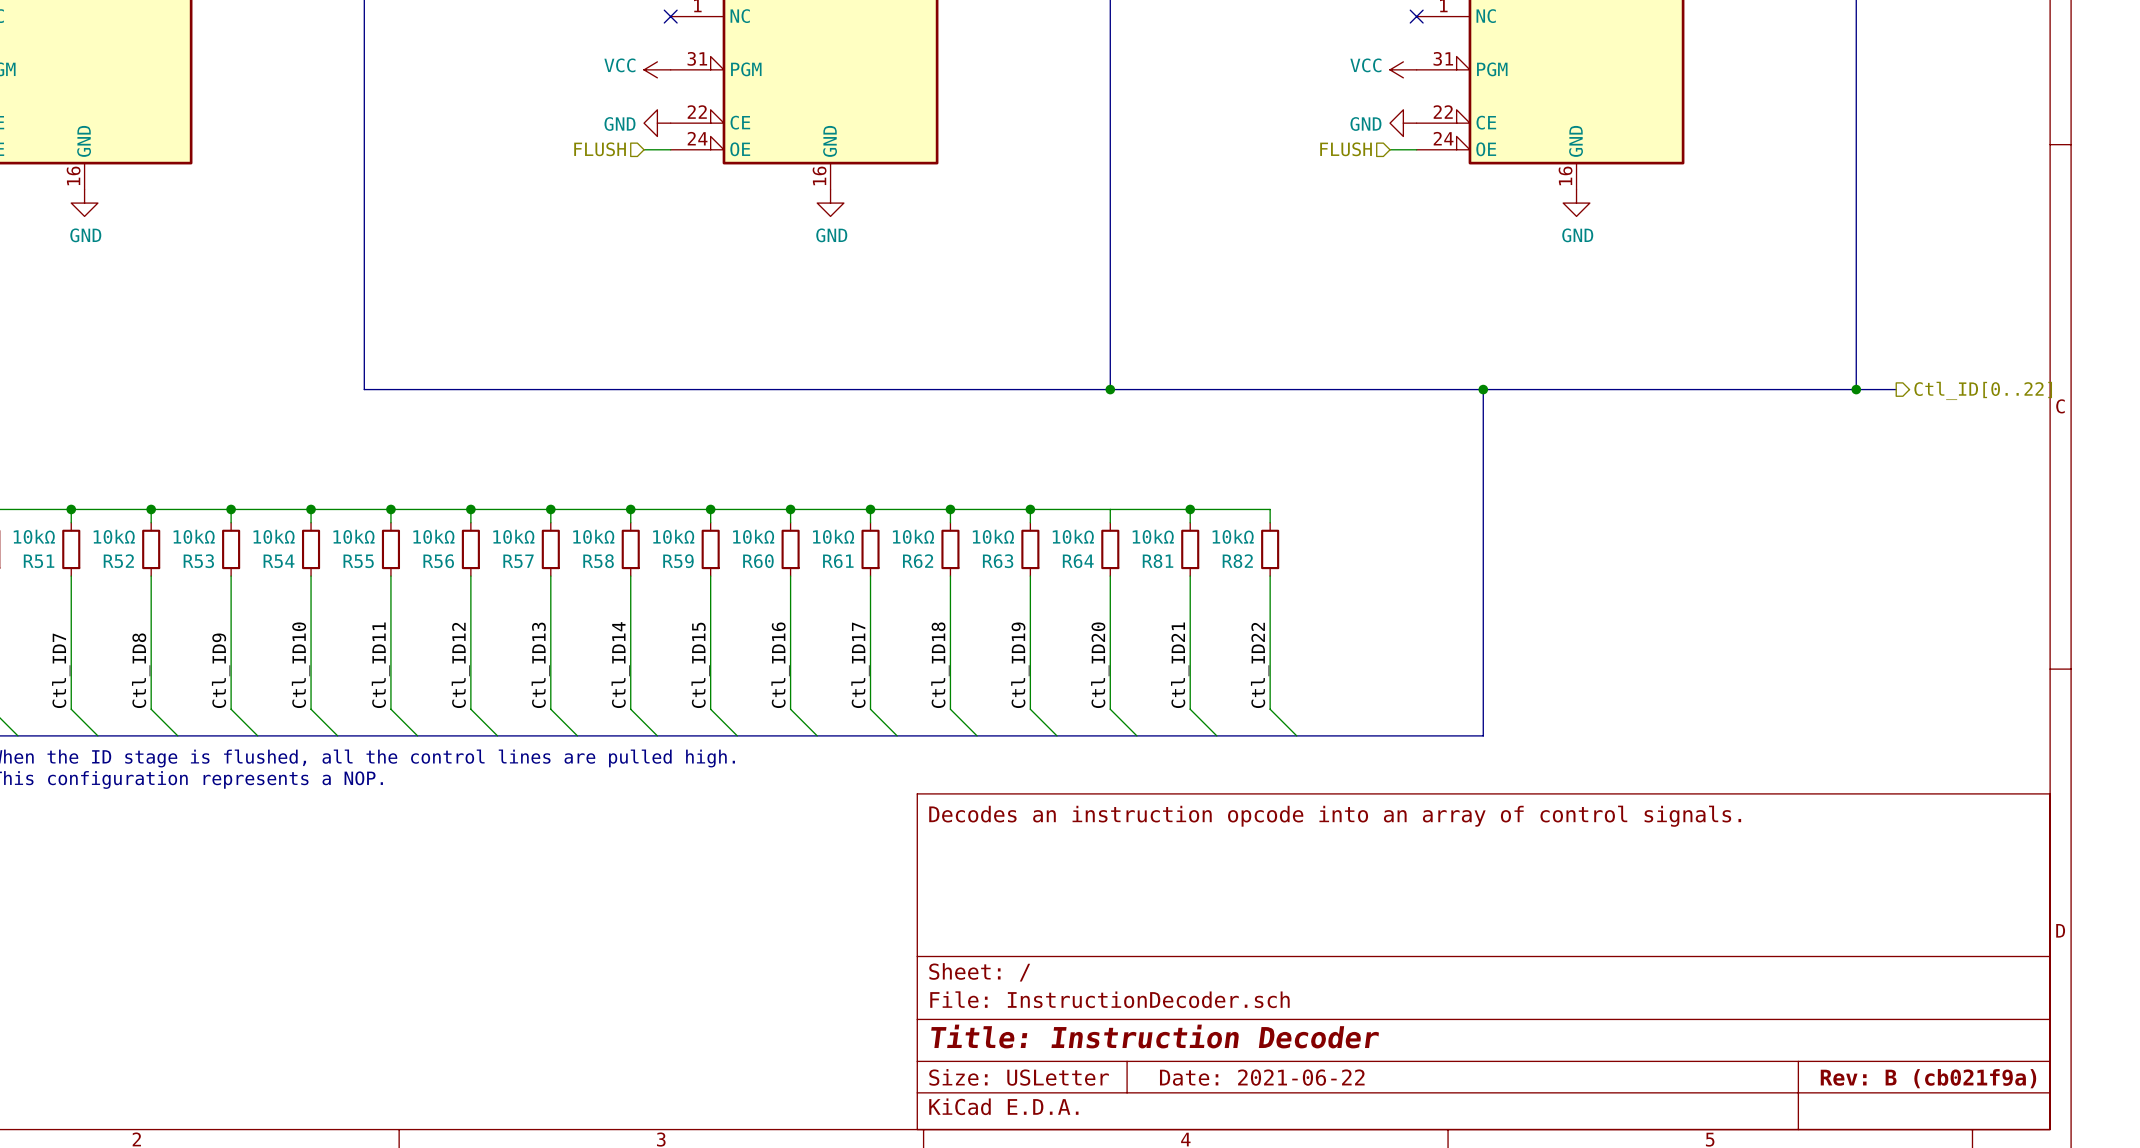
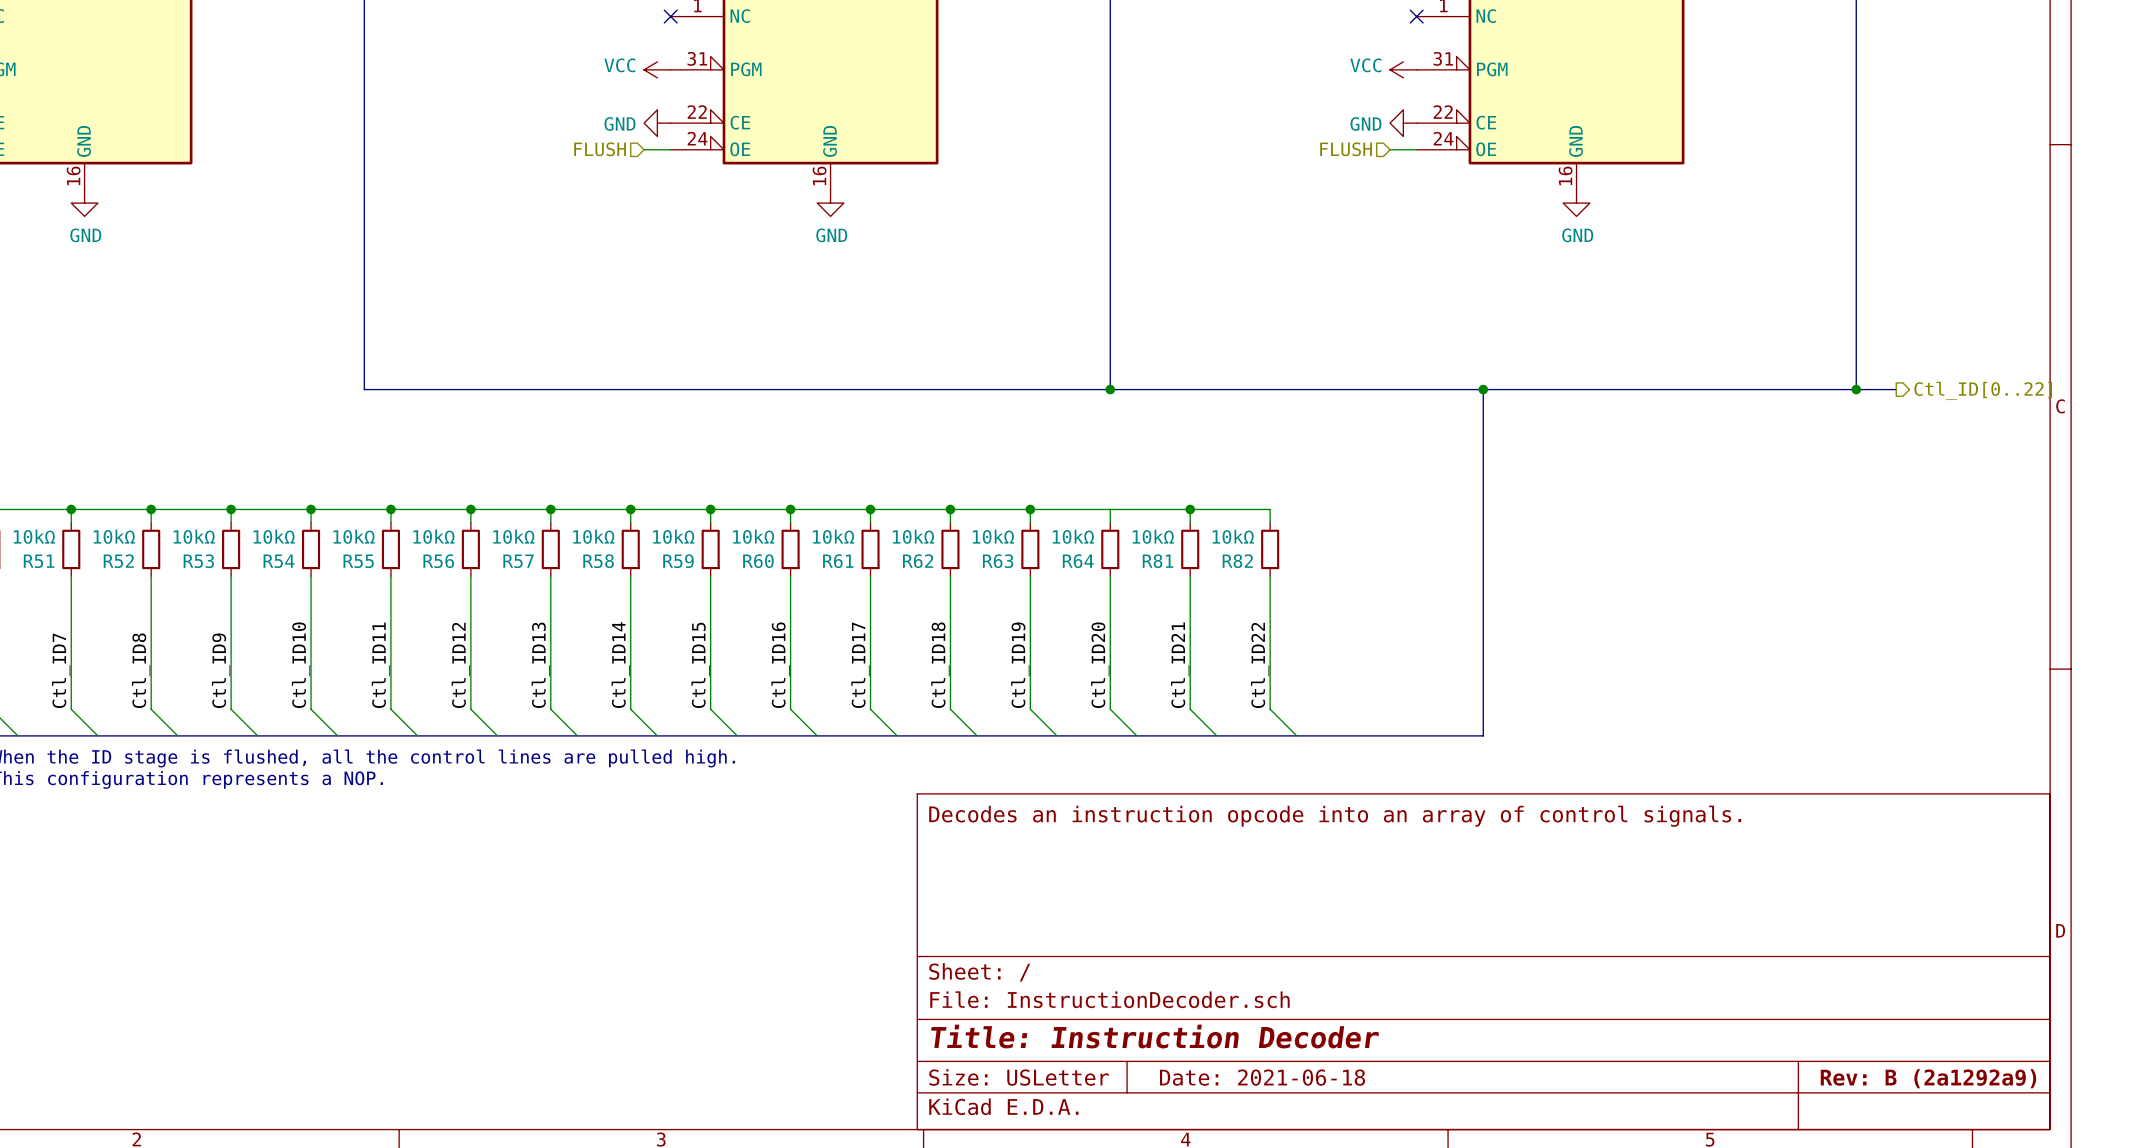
title block: Date: 2021-06-22 (1262, 1077) -> Date: 2021-06-18 (1262, 1077)
title block: Rev: B (cb021f9a) (1928, 1078) -> Rev: B (2a1292a9) (1928, 1078)

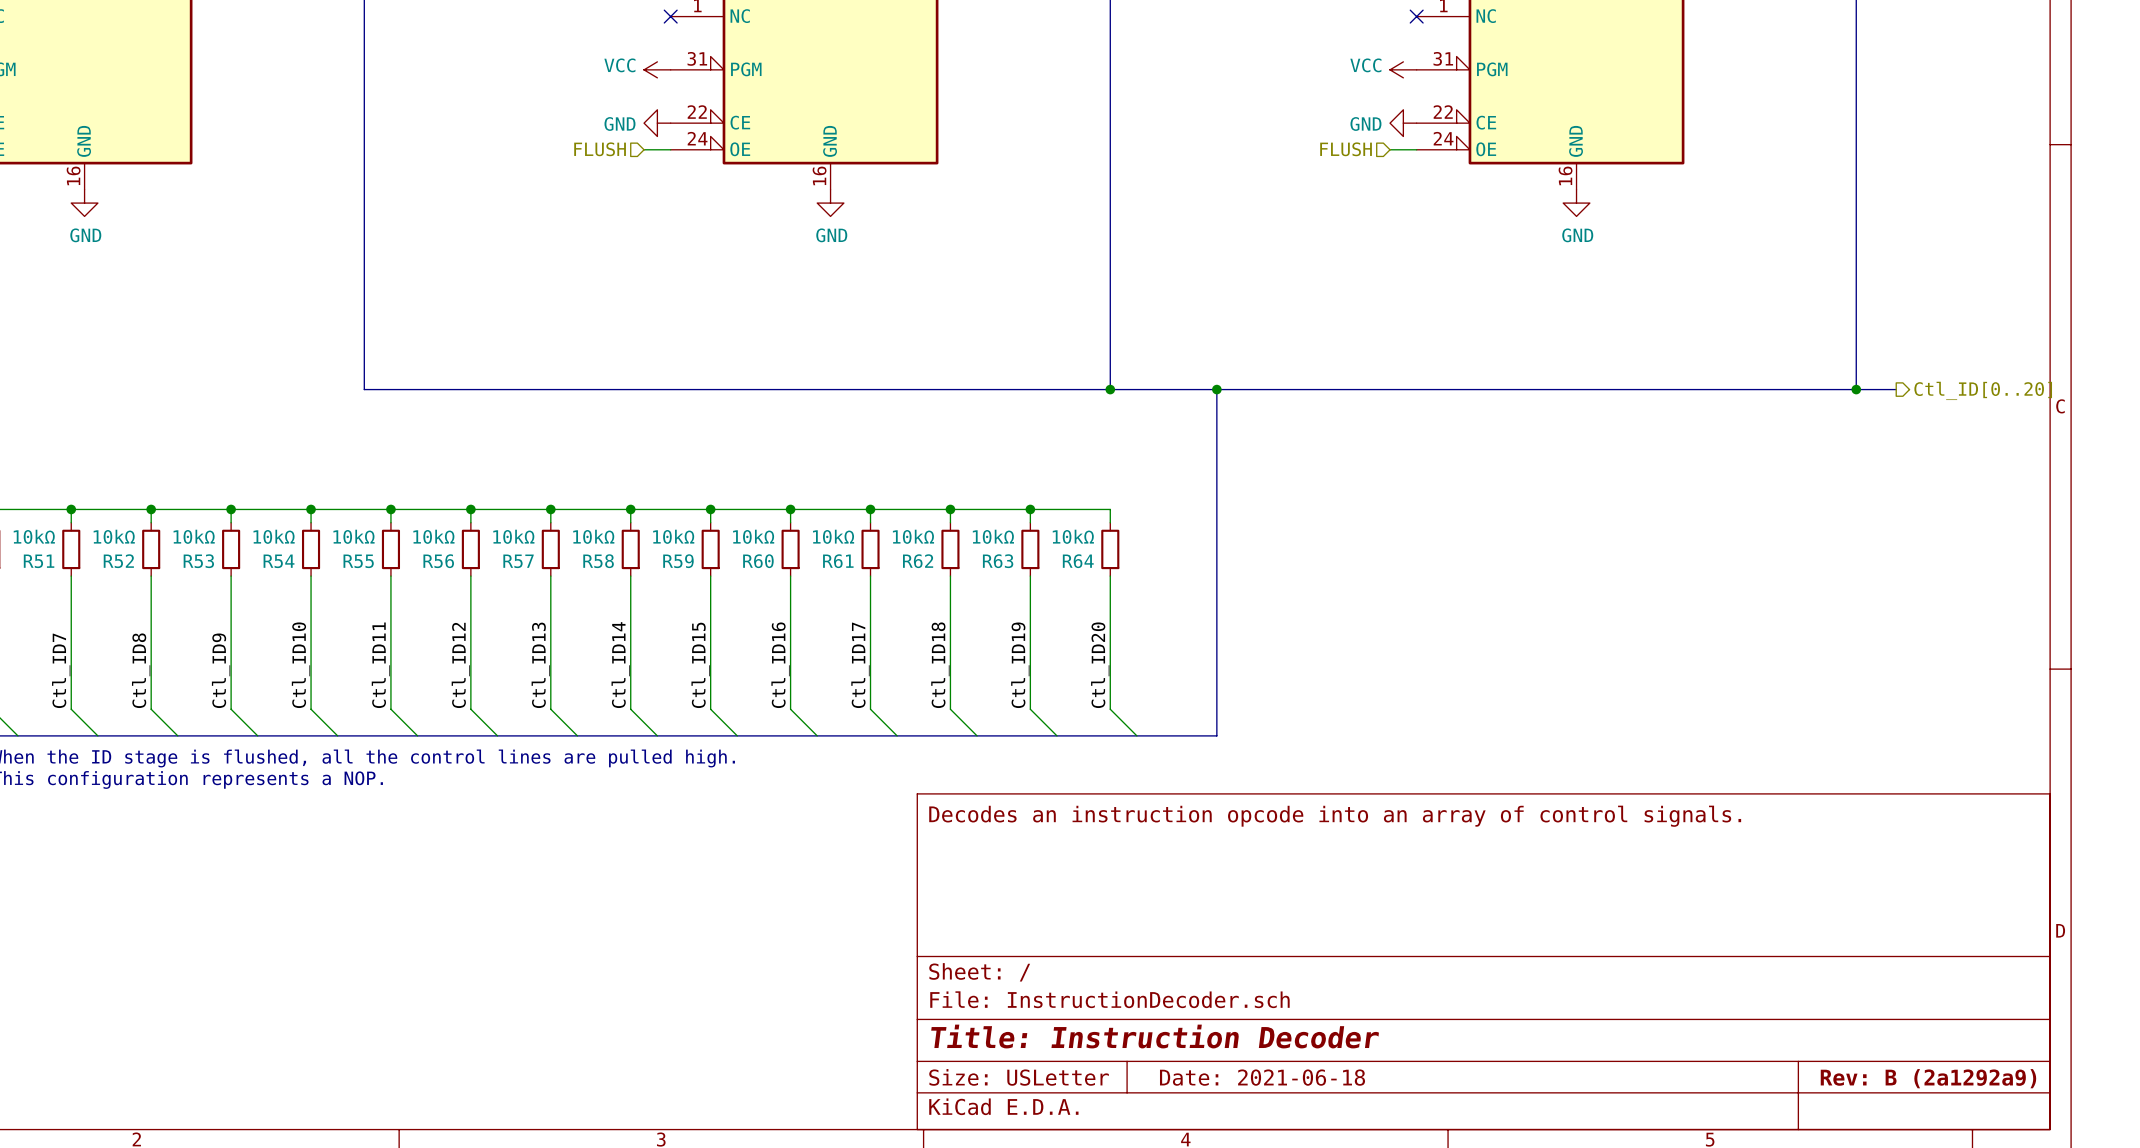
junction: none -> (1216, 389)
bus: (1483, 389) (1483, 735) (1216, 735) -> (1216, 389) (1216, 735)
junction: (1483, 389) -> none
hierarchical label: Ctl_ID[0..22] (1983, 390) -> Ctl_ID[0..20] (1983, 390)
wire: (1110, 509) (1270, 509) (1270, 522) -> none
wire: (1190, 509) (1190, 522) -> none
junction: (1190, 509) -> none
R81: 10kΩ (1190, 549) -> none
R82: 10kΩ (1270, 549) -> none
wire: (1190, 576) (1190, 709) (1216, 735) -> none
wire: (1270, 576) (1270, 709) (1296, 735) -> none
label: Ctl_ID21 (1180, 665) -> none
label: Ctl_ID22 (1260, 665) -> none

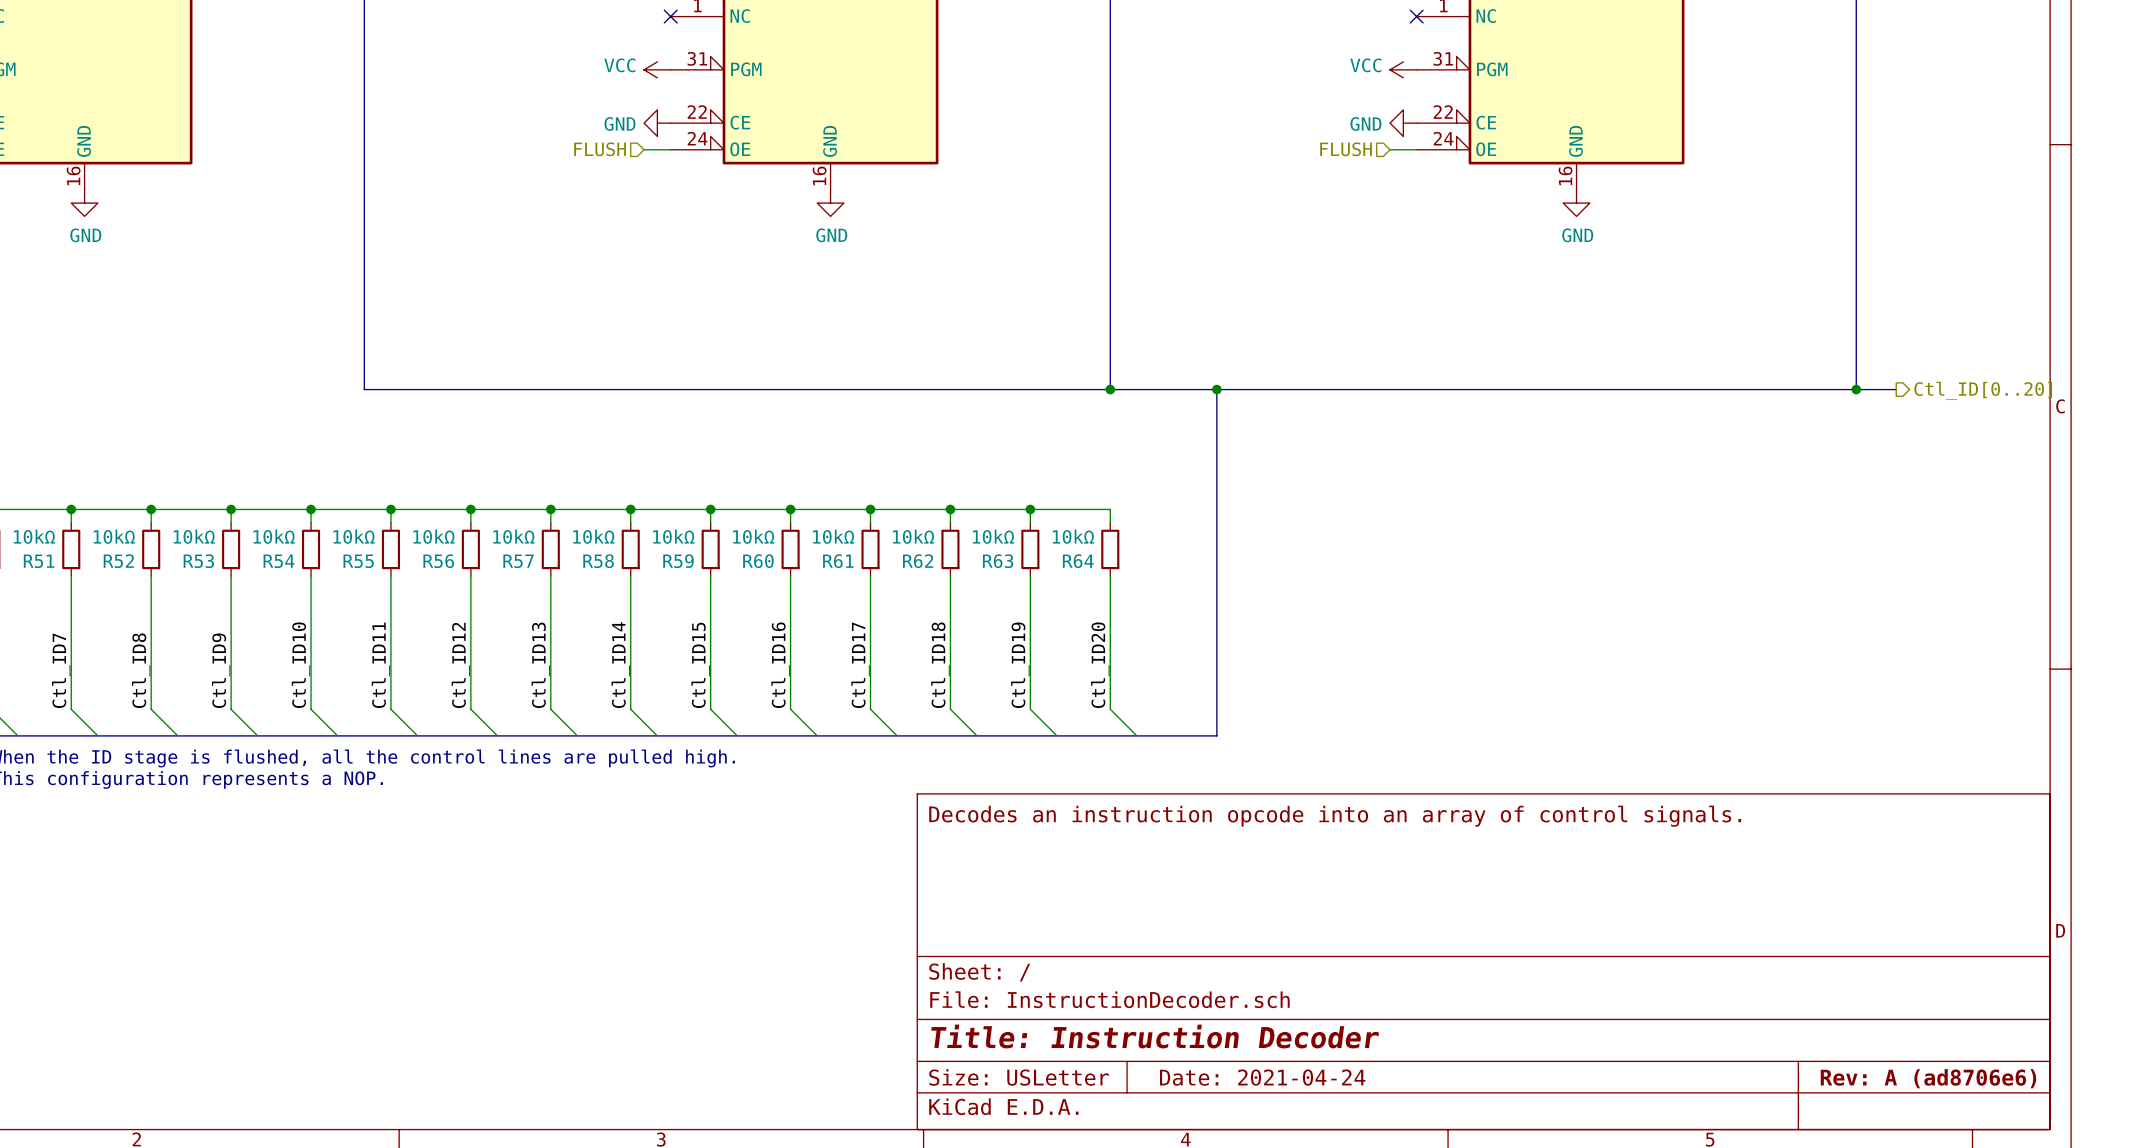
title block: Date: 2021-06-18 (1262, 1077) -> Date: 2021-04-24 (1262, 1077)
title block: Rev: B (2a1292a9) (1928, 1078) -> Rev: A (ad8706e6) (1928, 1078)

